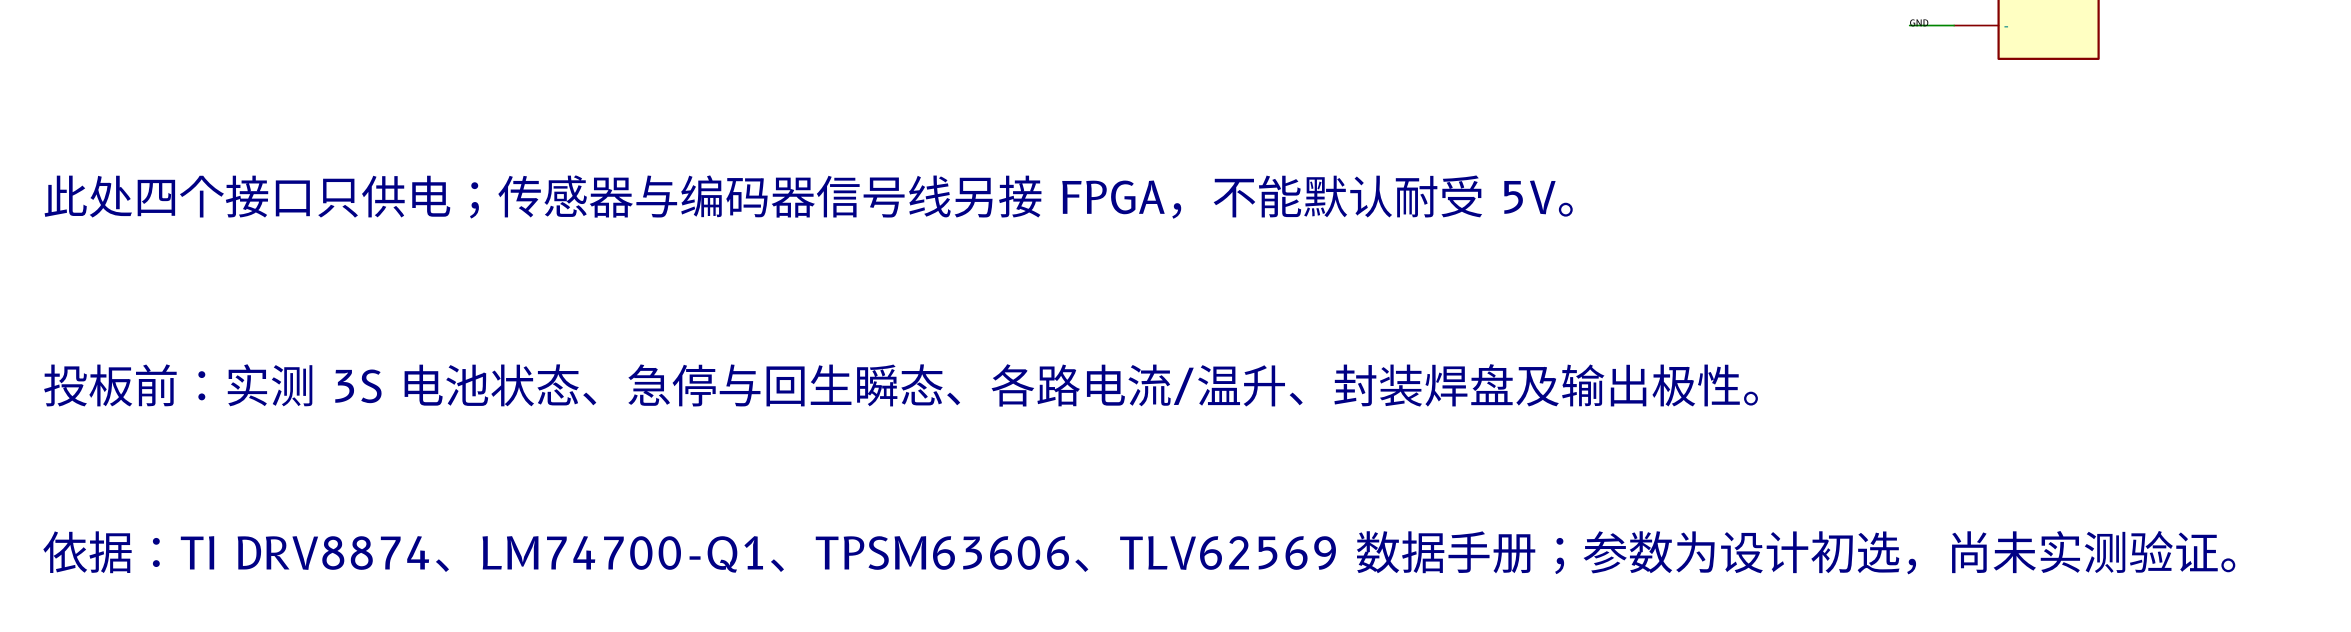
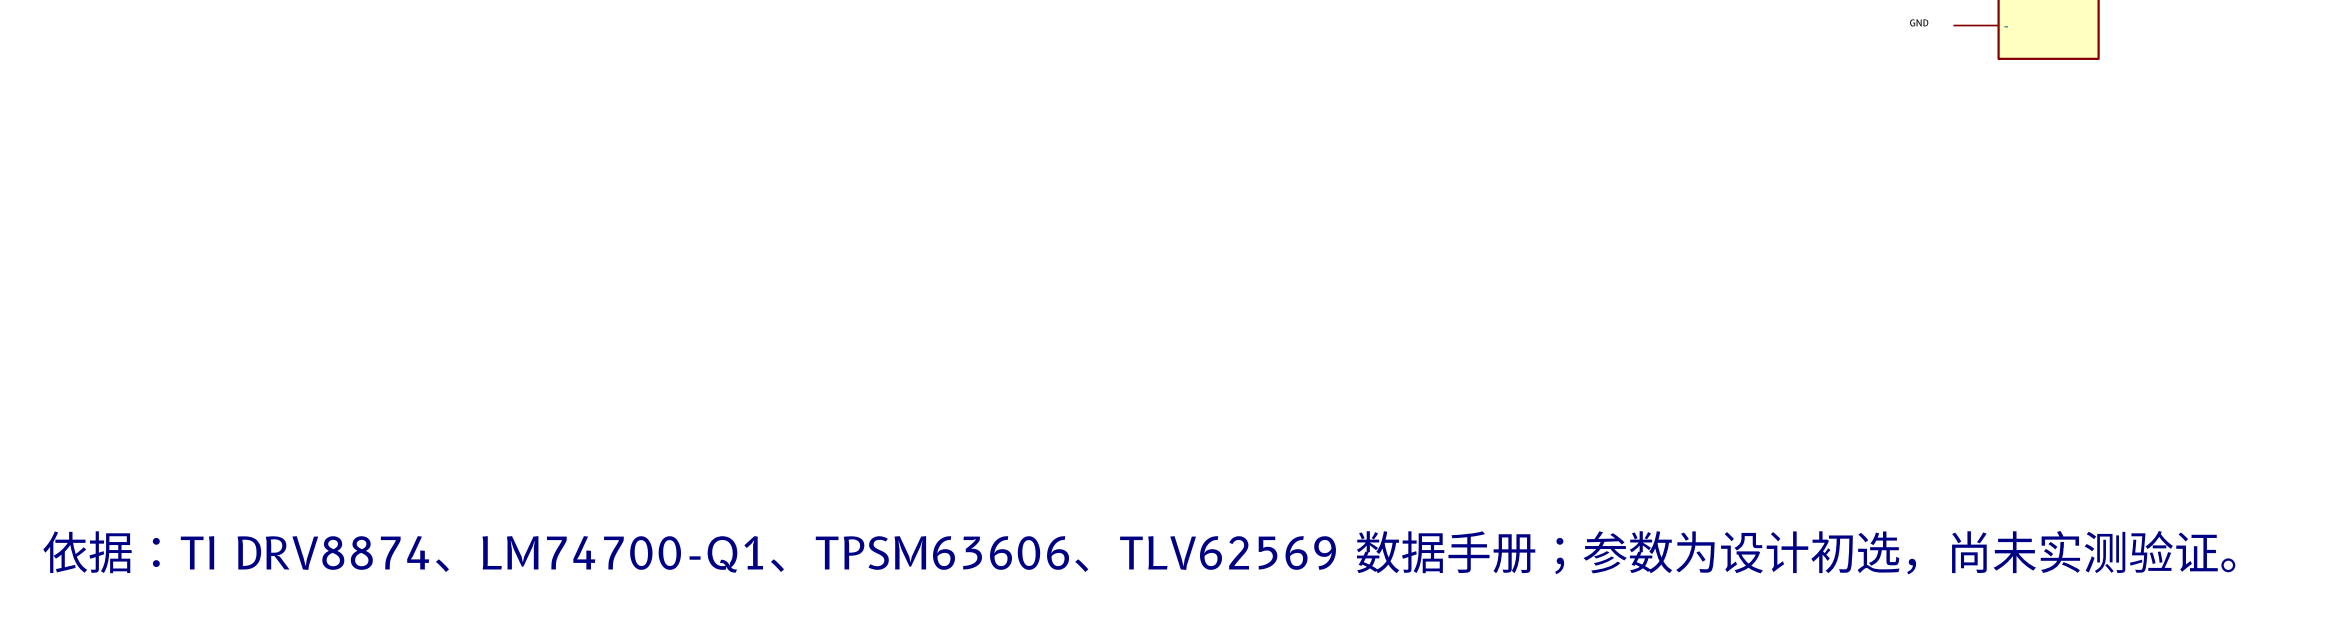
wire: (1909, 25) (1954, 25) -> none
text: 此处四个接口只供电；传感器与编码器信号线另接 FPGA，不能默认耐受 5V。 (808, 197) -> none
text: 投板前：实测 3S 电池状态、急停与回生瞬态、各路电流/温升、封装焊盘及输出极性。 (901, 385) -> none

